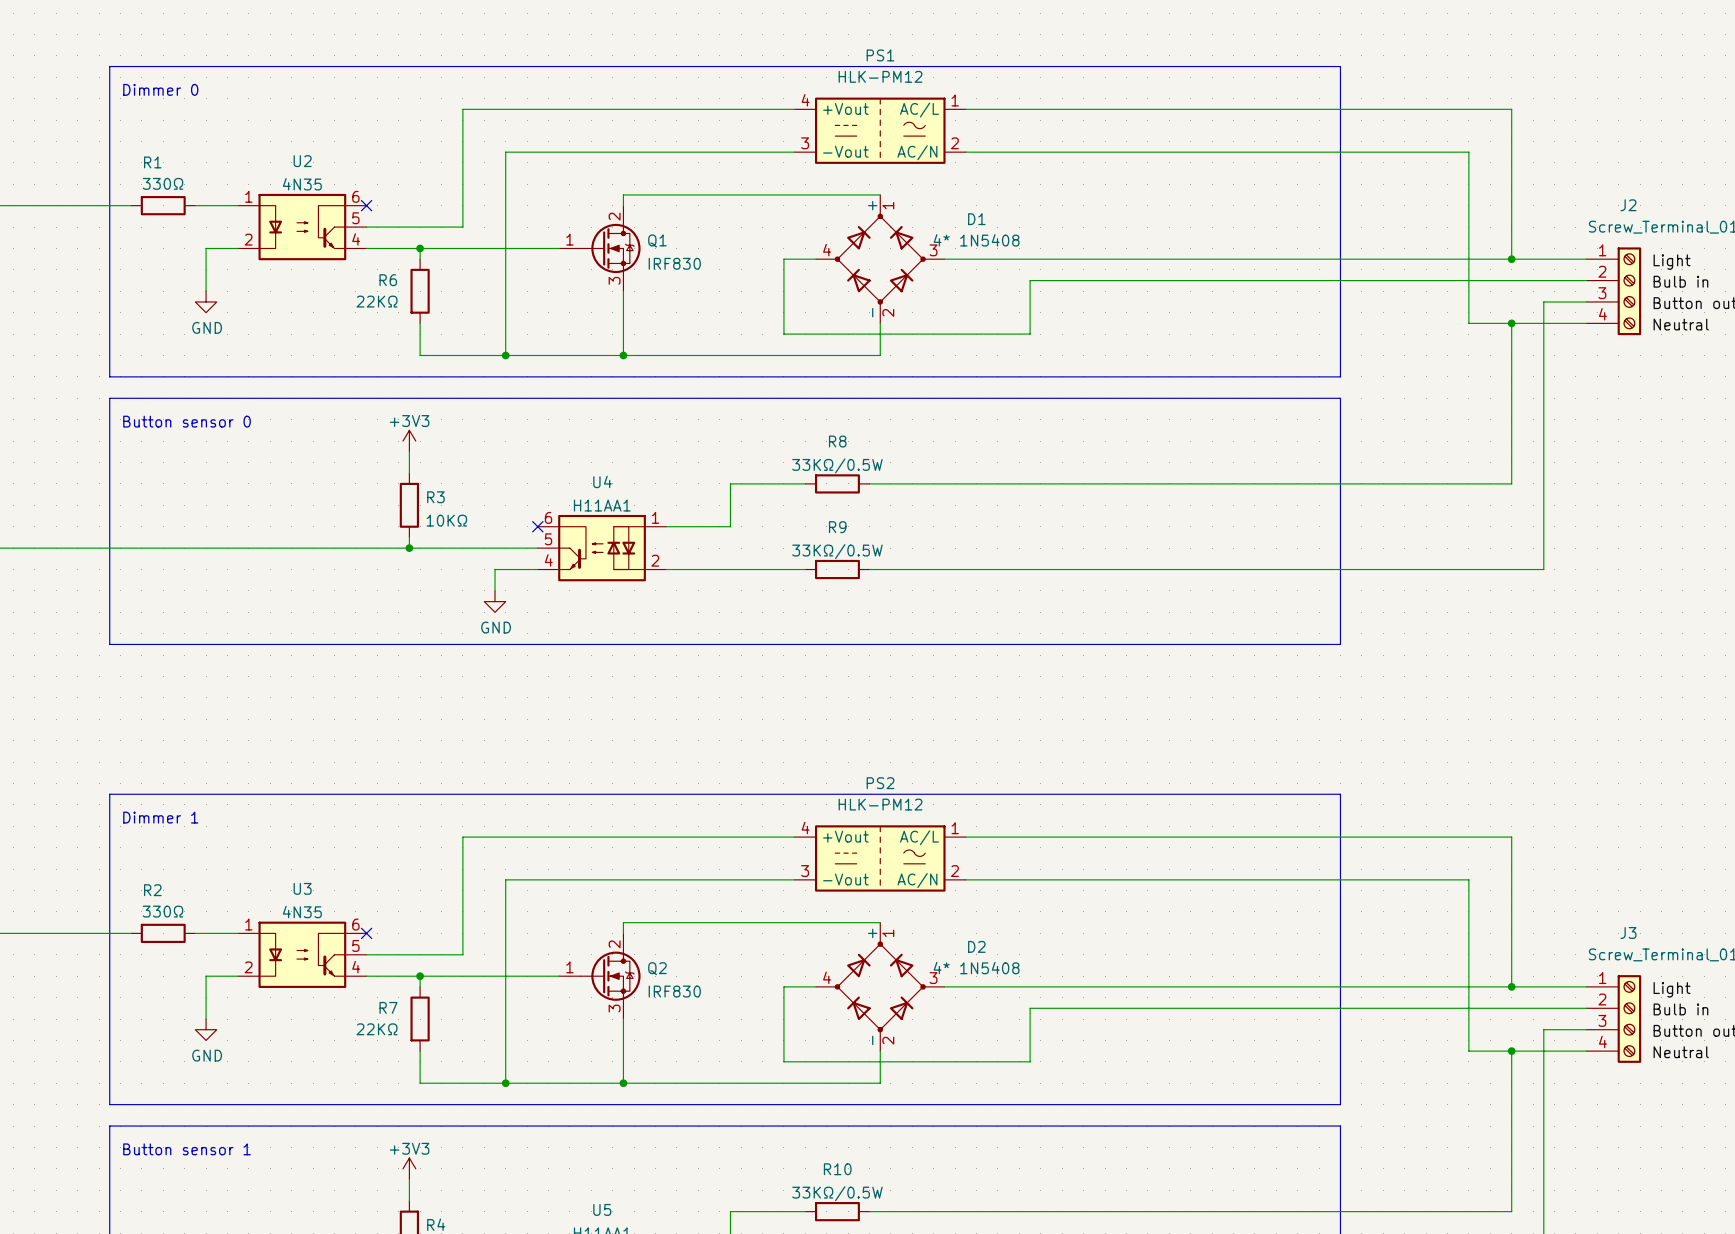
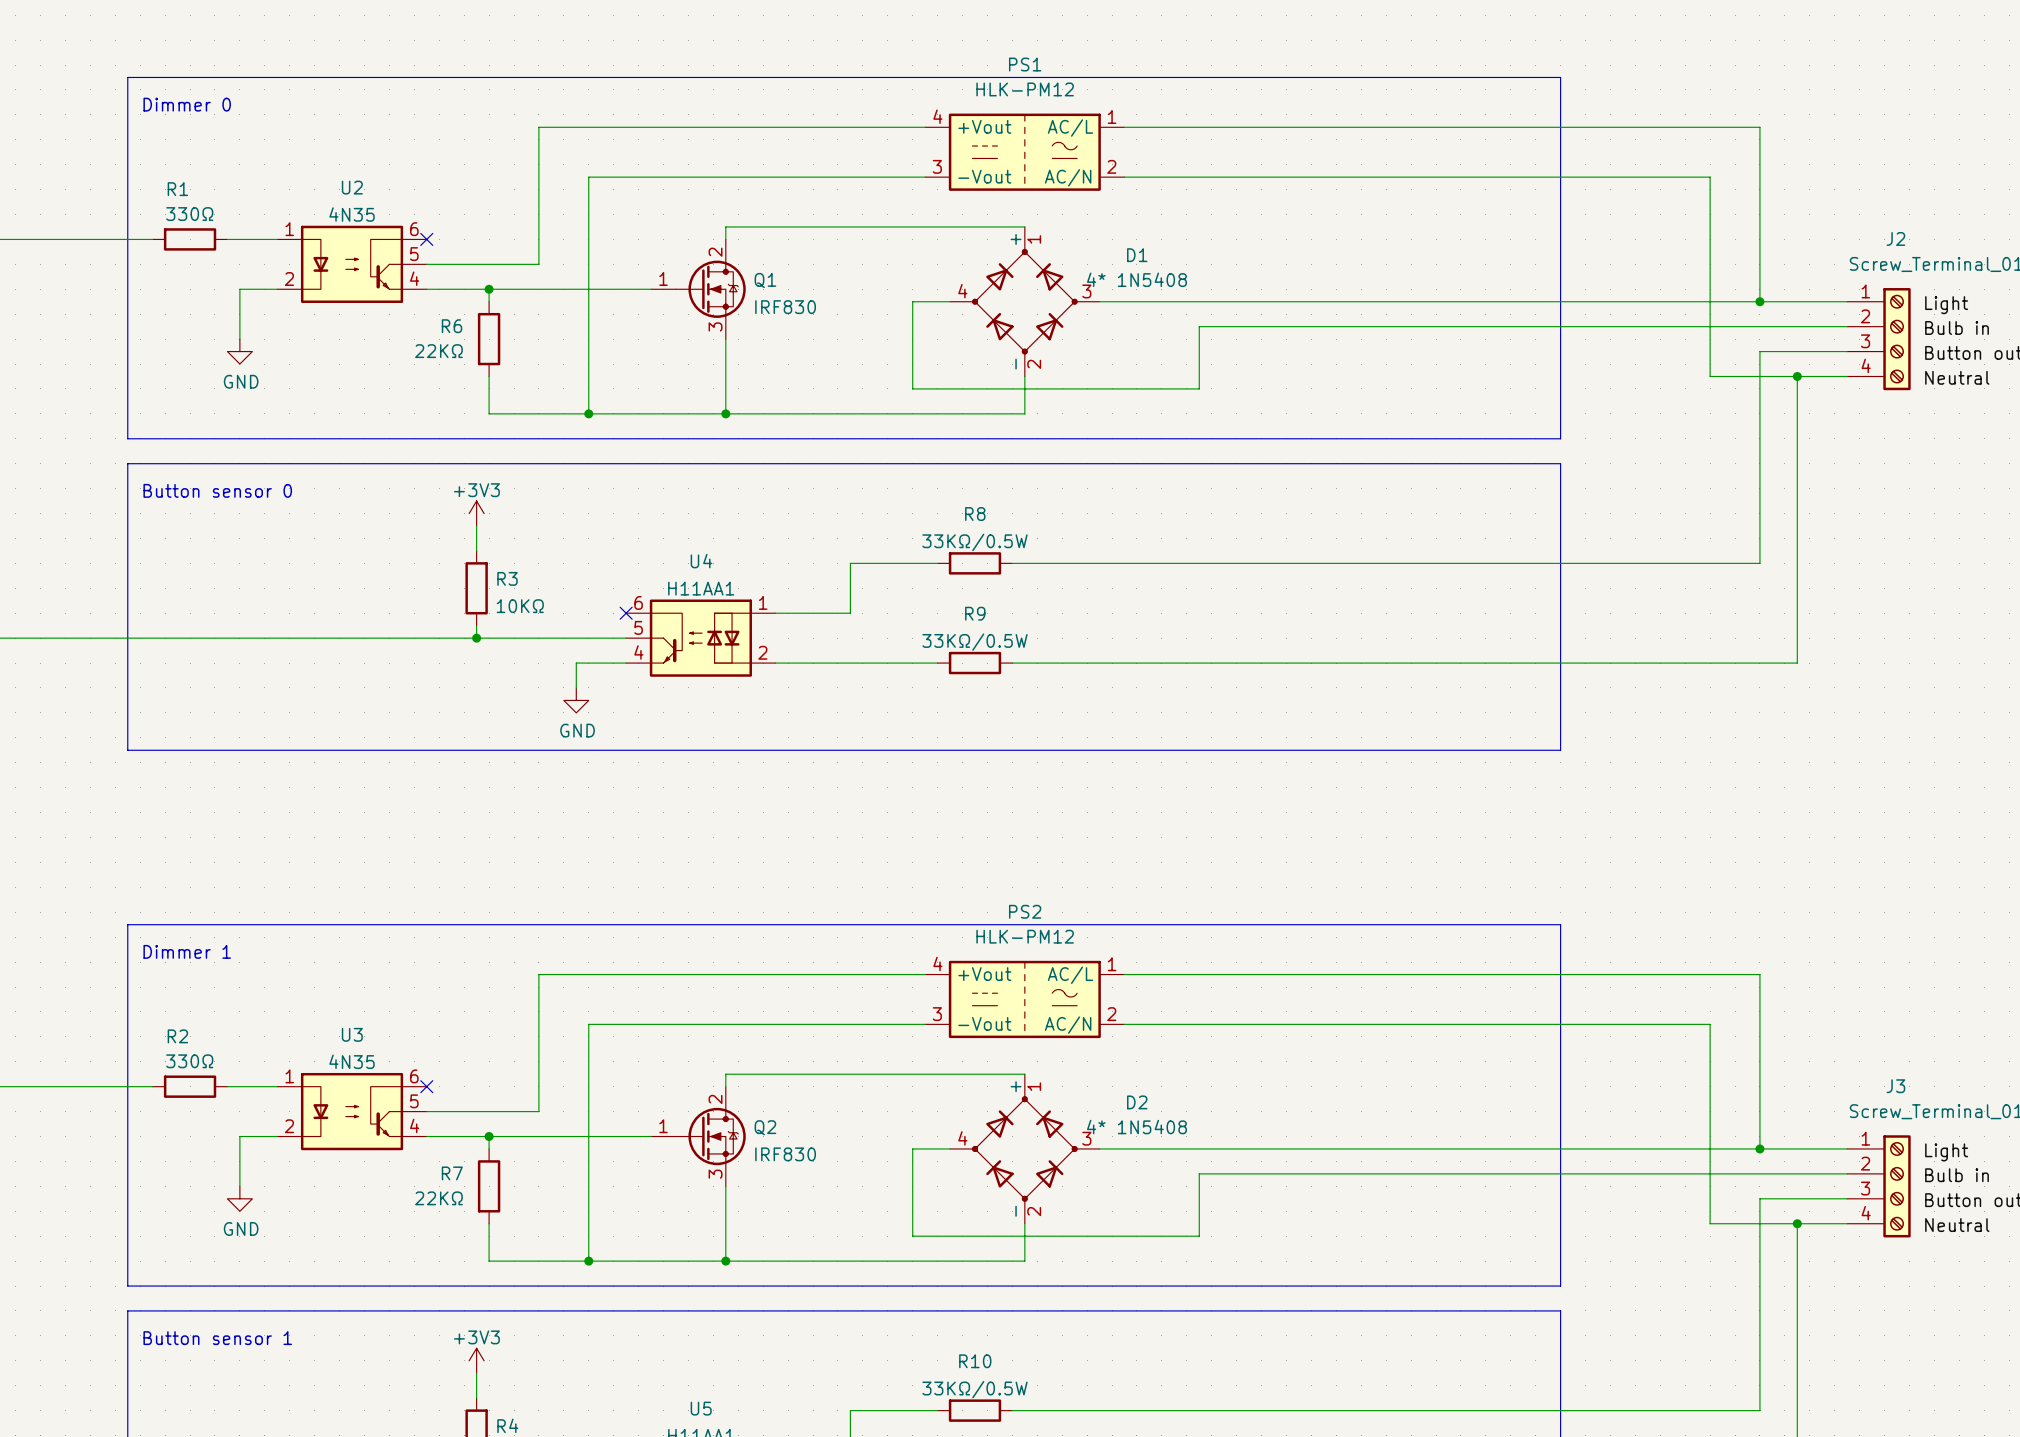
wire: (1543, 301) (1543, 323) -> (1797, 351) (1759, 351) (1759, 376)
junction position: (1511, 323) -> (1797, 376)
wire: (1543, 1029) (1543, 1051) -> (1797, 1198) (1759, 1198) (1759, 1223)
junction position: (1511, 1051) -> (1797, 1223)

